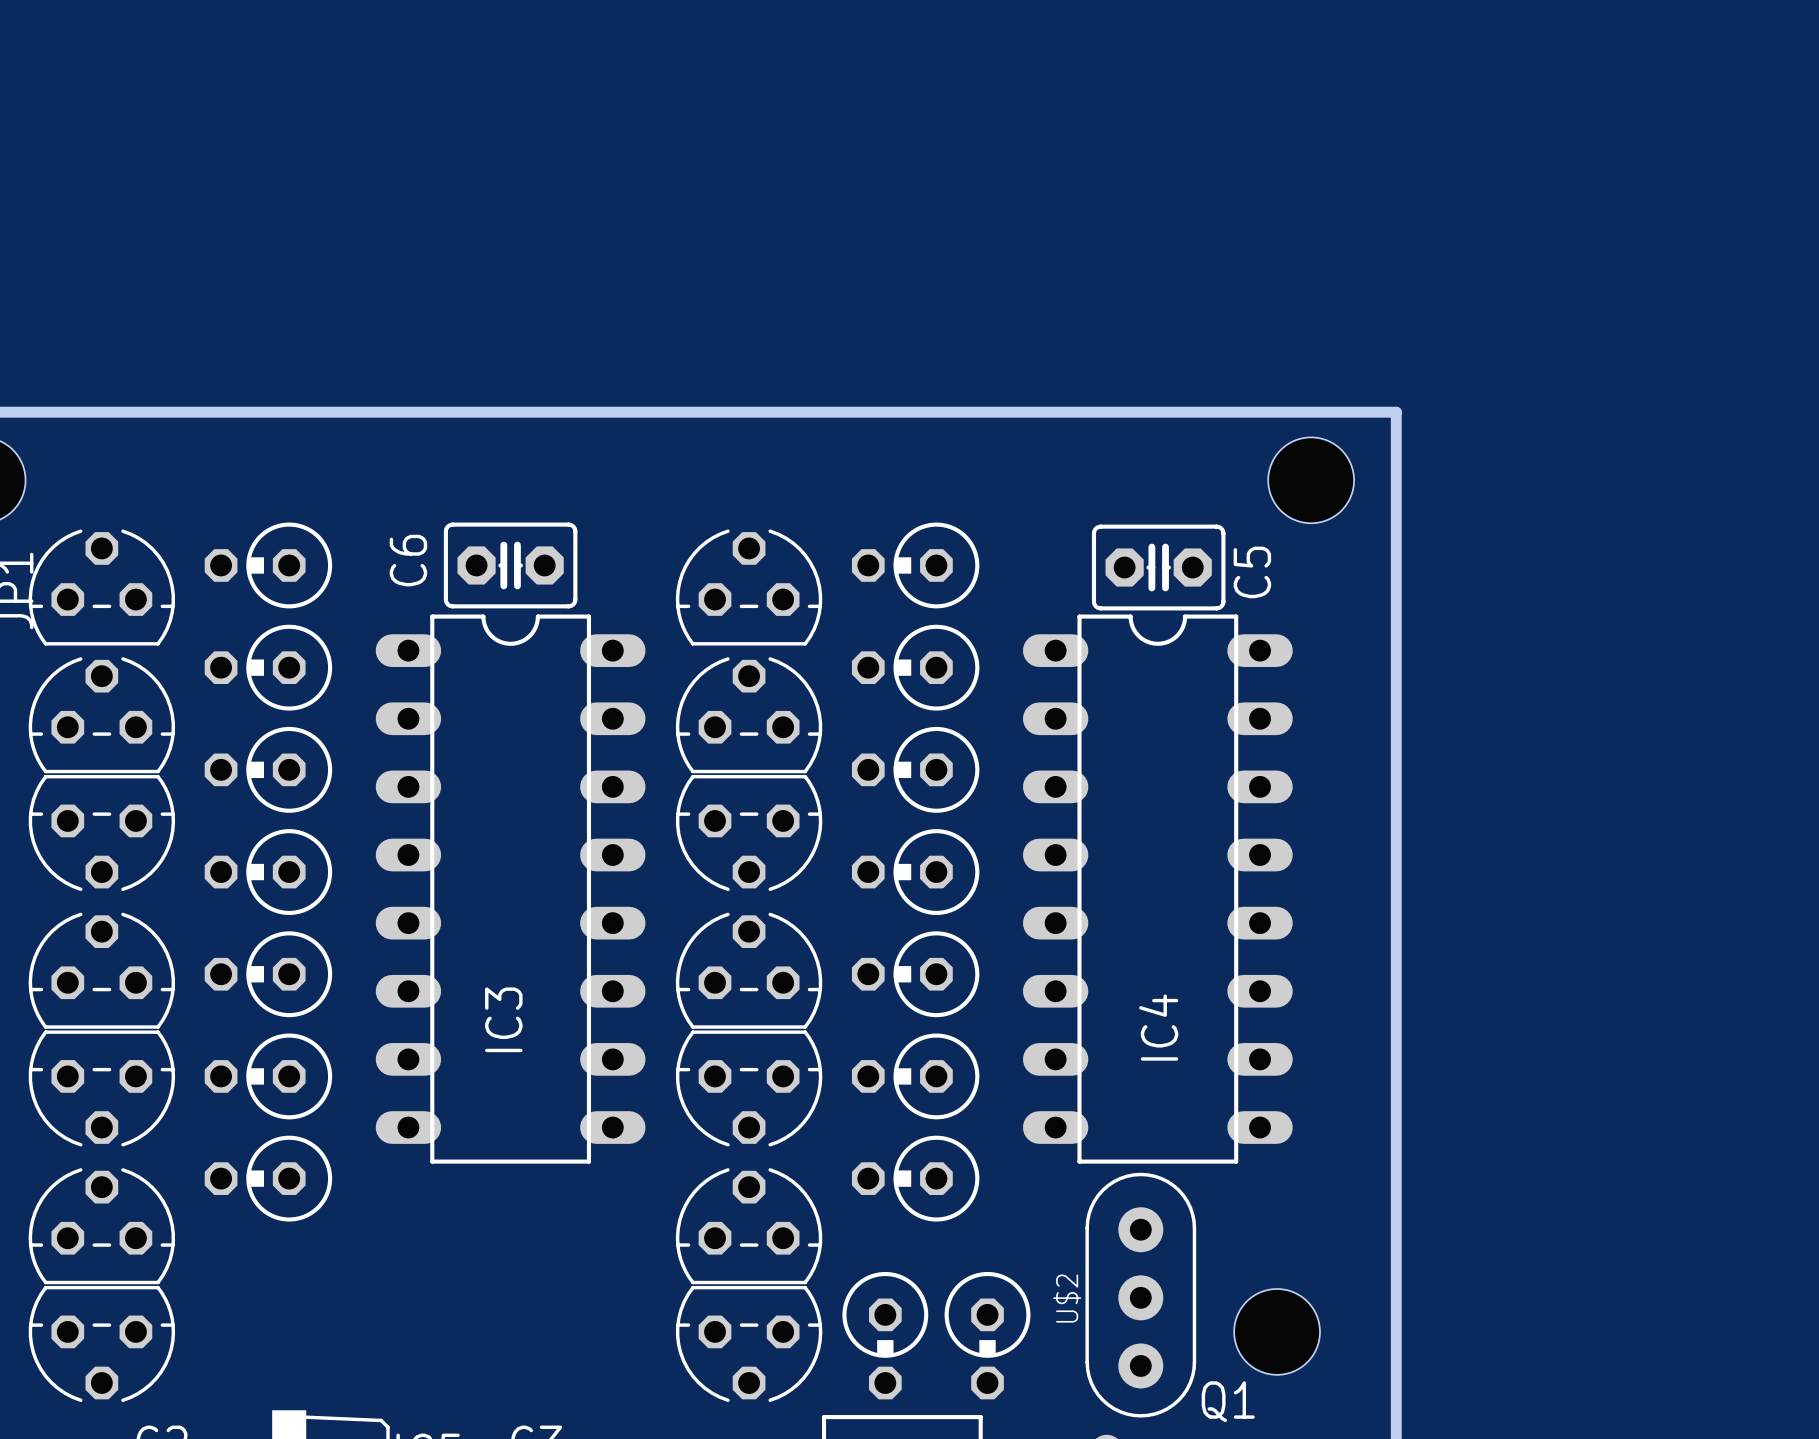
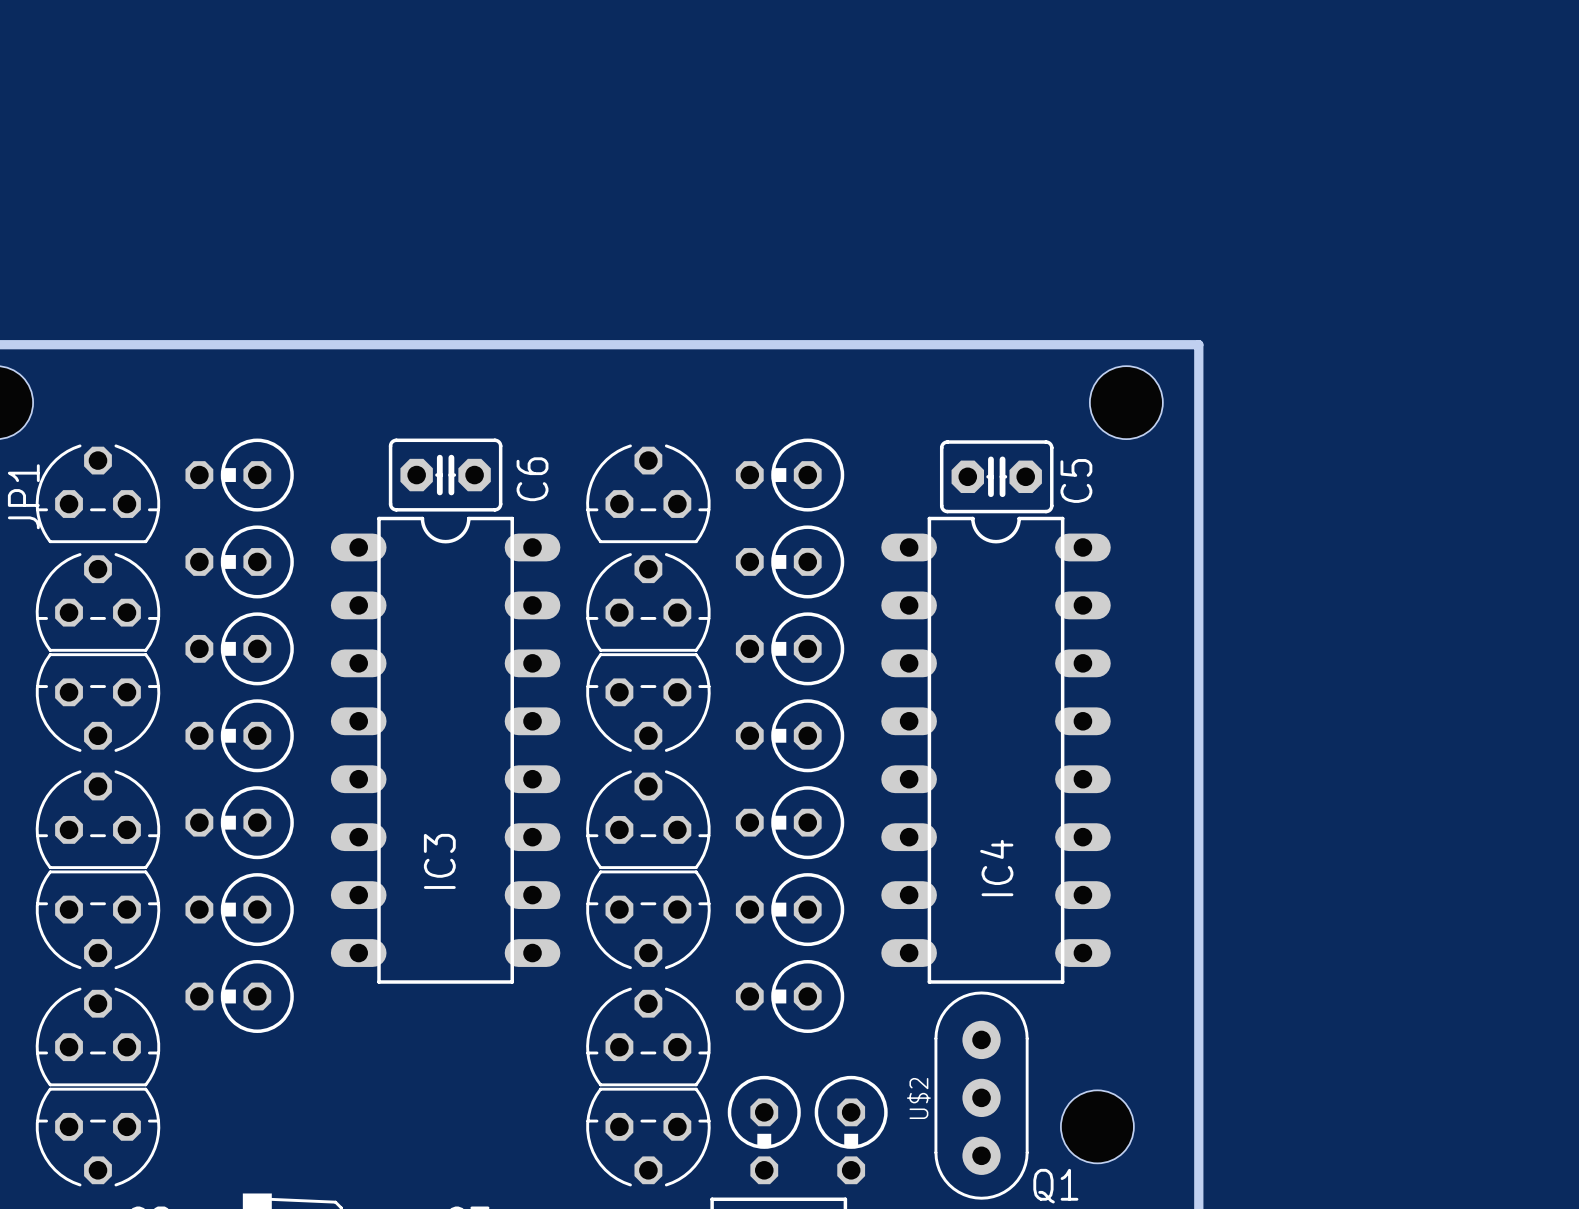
C6 name position: C6 (408, 560) -> C6 (532, 479)

